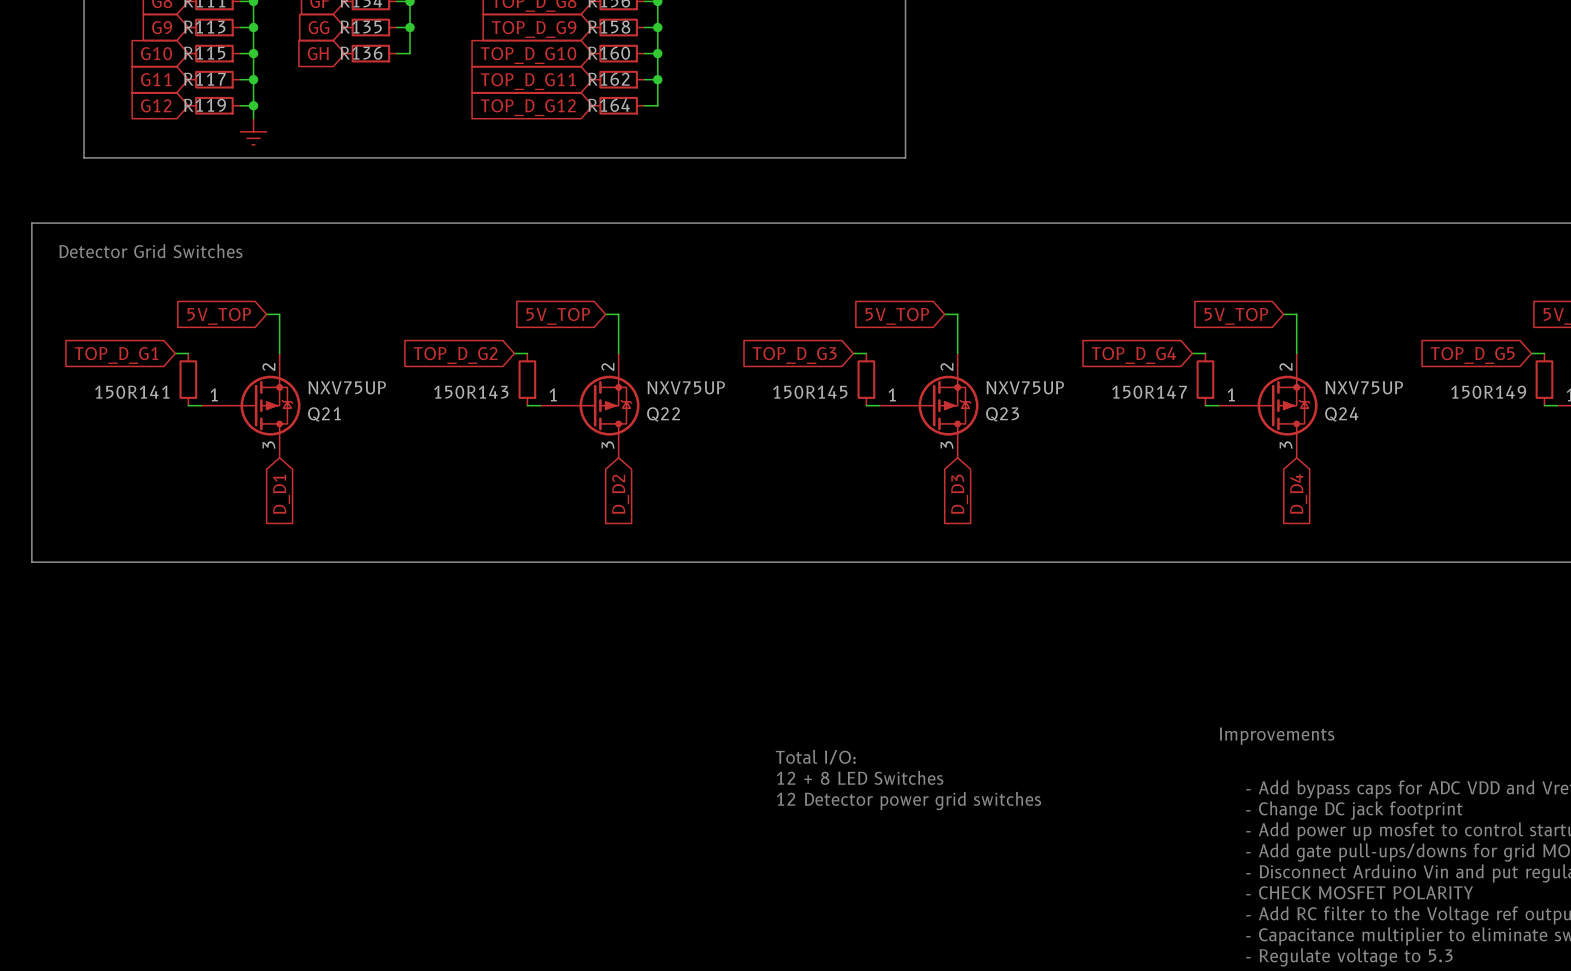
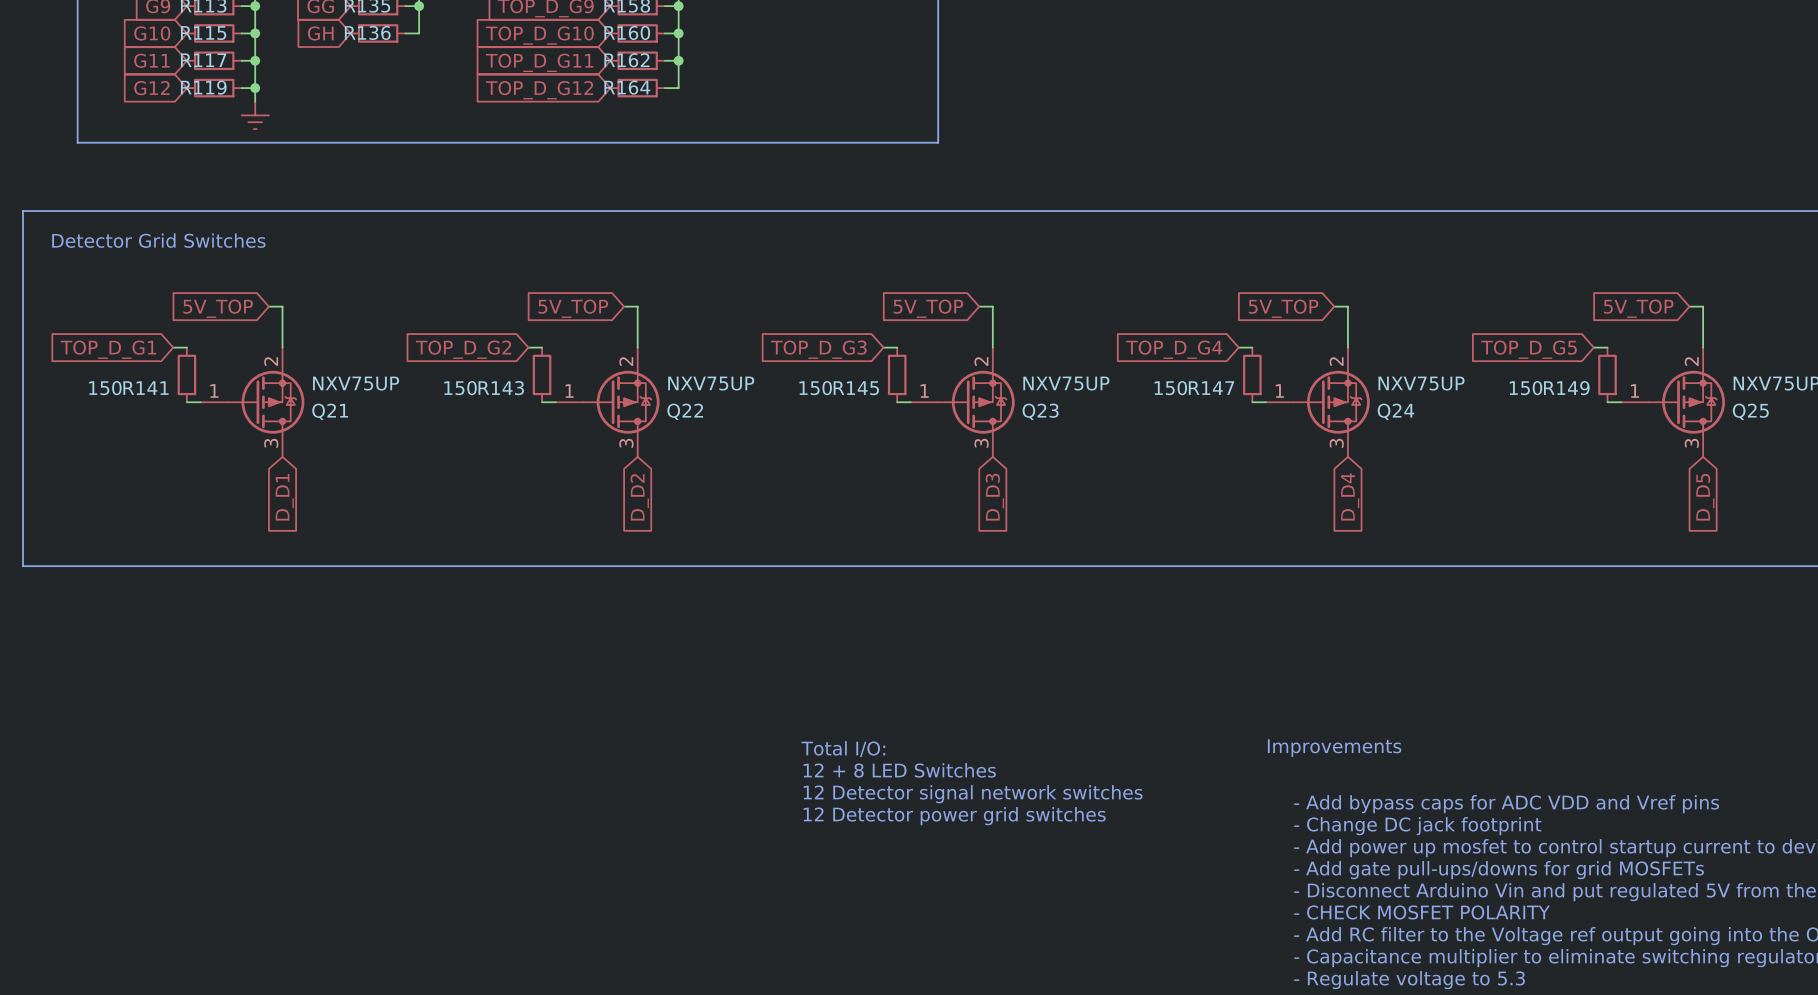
text: none -> Total I/O: (843, 749)
text: Total I/O: (815, 757) -> 12 + 8 LED Switches (899, 770)
text: 12 + 8 LED Switches (860, 777) -> 12 Detector signal network switches (973, 794)

